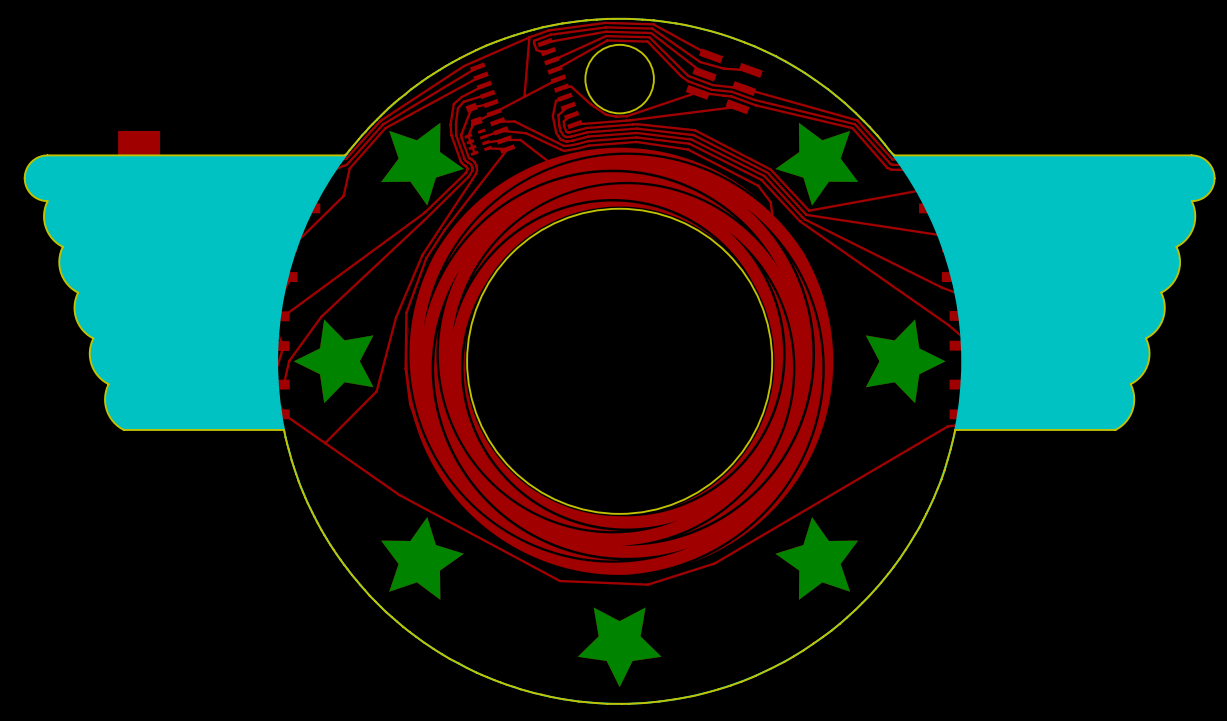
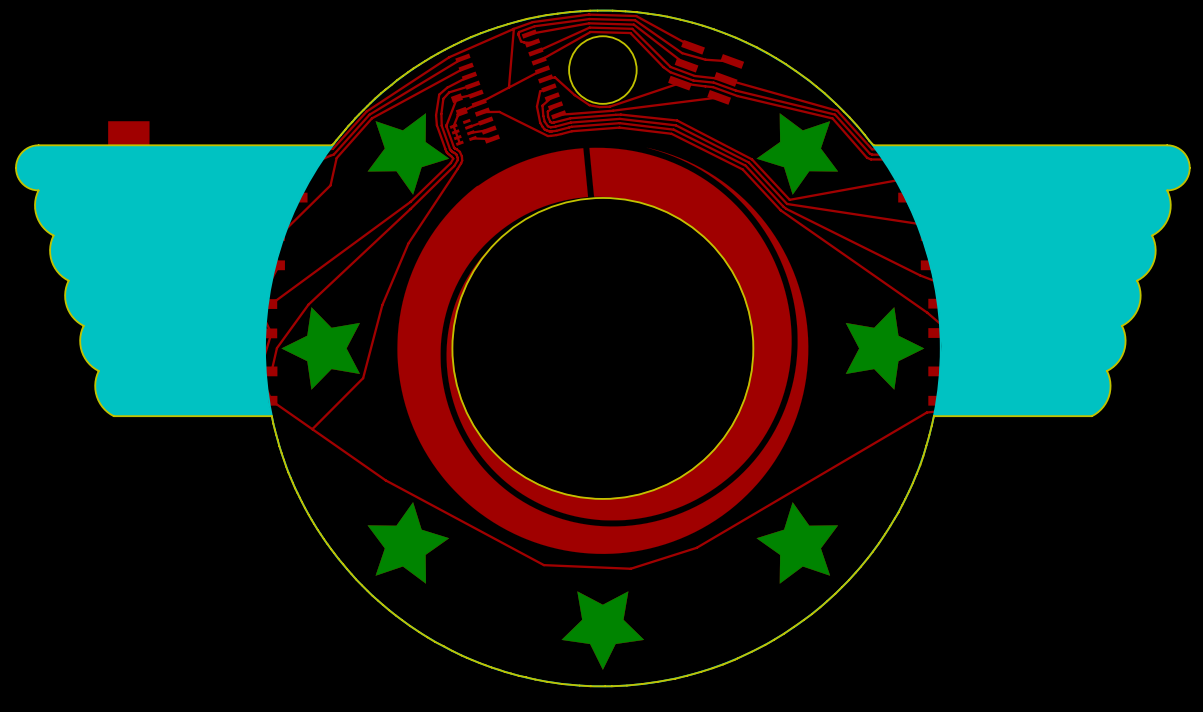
top track: (500, 130) (525, 133) (564, 150) (588, 145) (636, 141) (687, 149) (758, 185) (770, 202) (772, 217) -> none
top track: (504, 139) (520, 139) (548, 161) -> none
drawing shape: [406, 147, 834, 576] -> [397, 147, 809, 554]
top track: (507, 149) (444, 229) (426, 258) (406, 312) (405, 368) (410, 404) (422, 439) -> none

